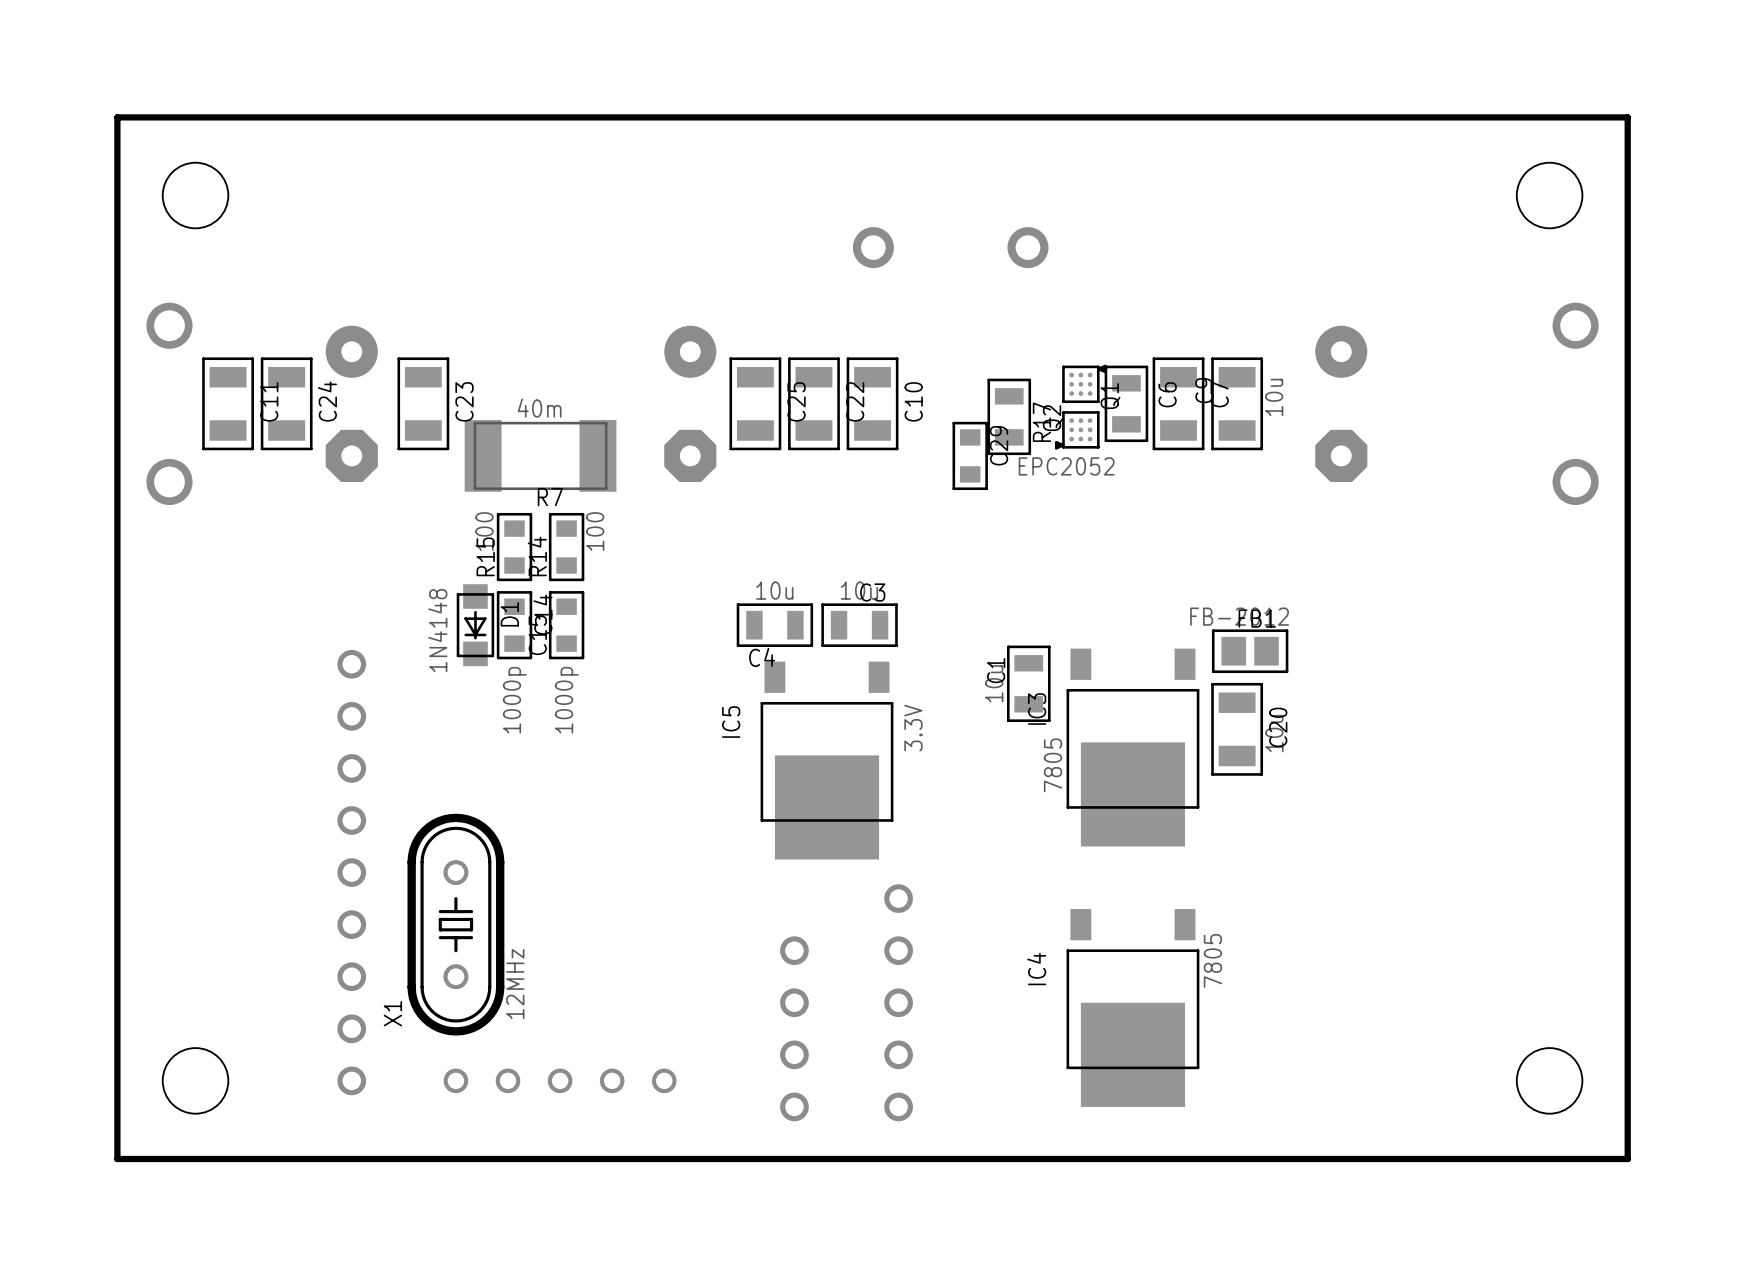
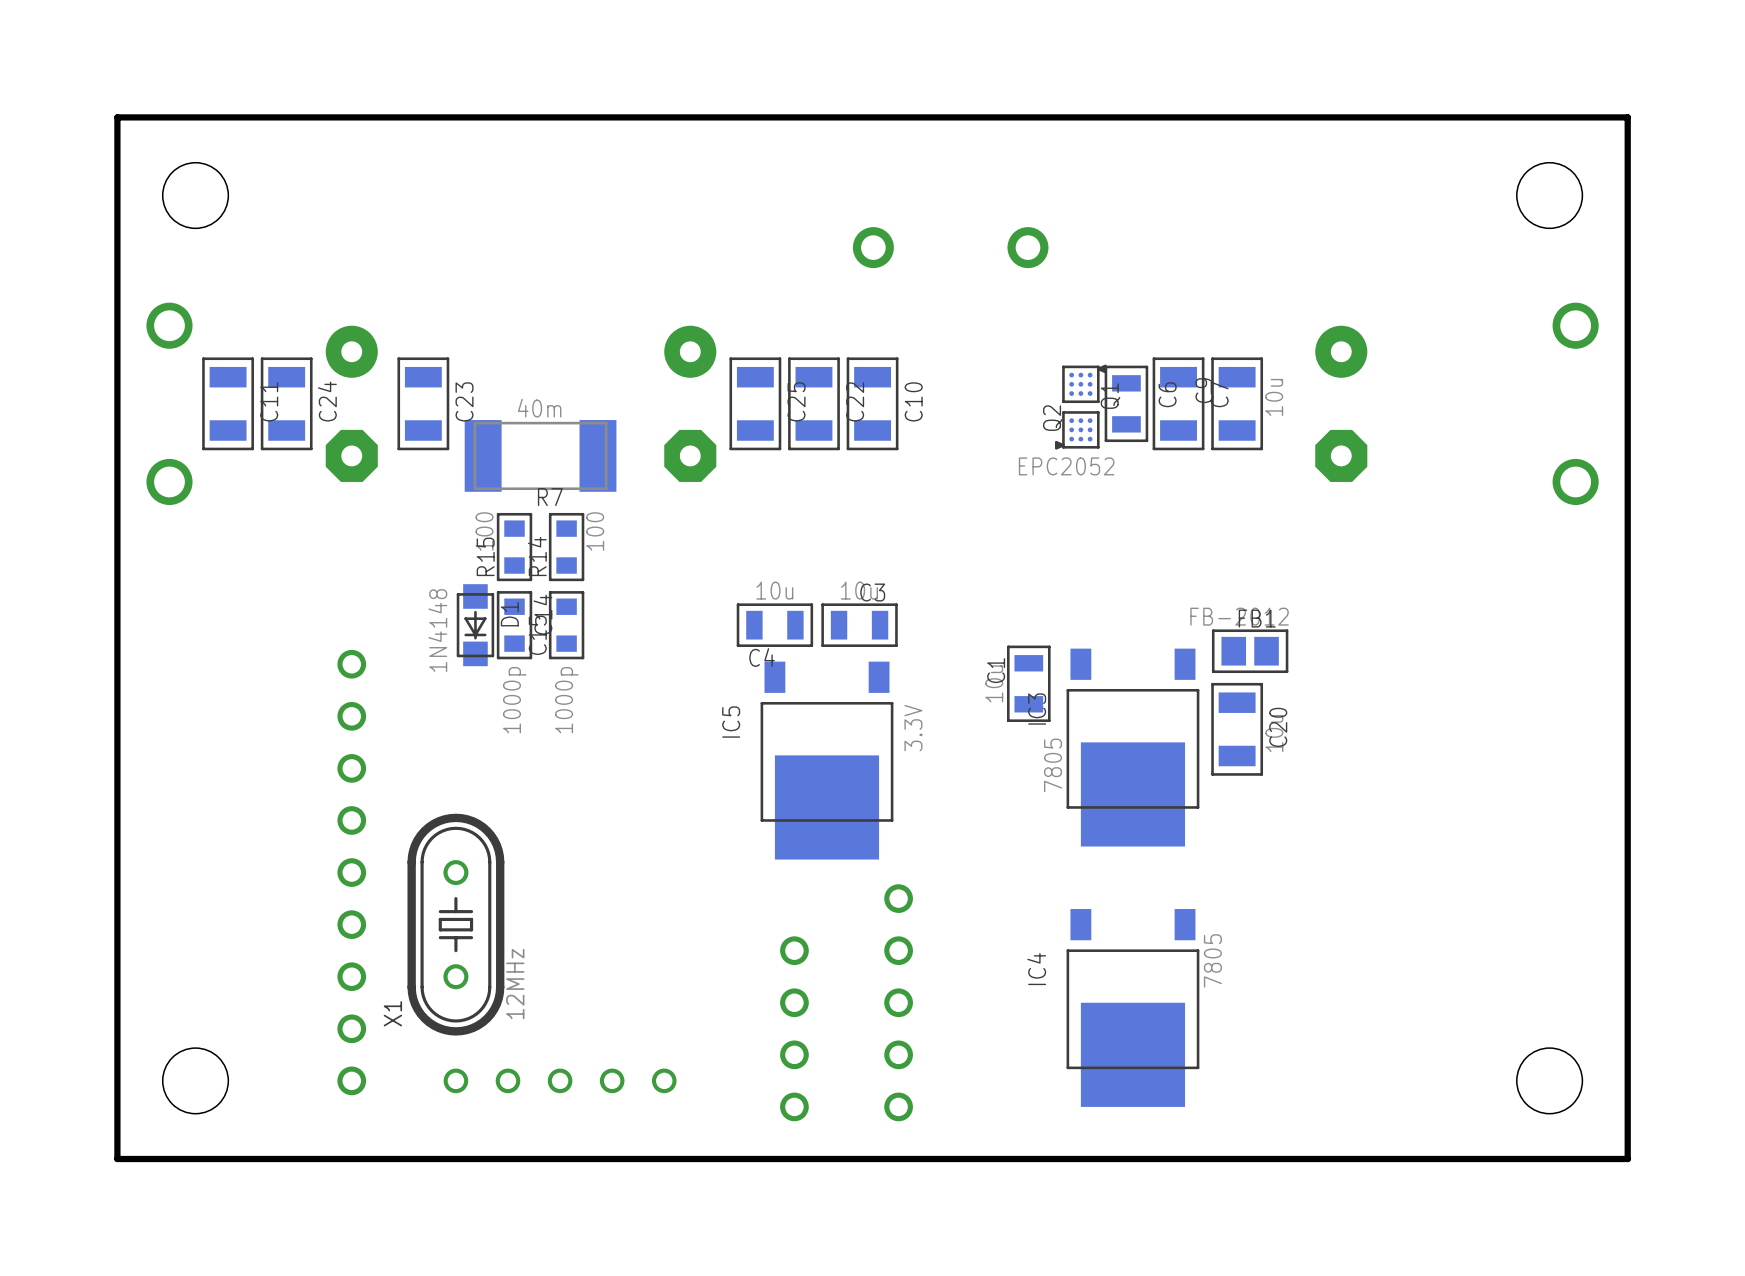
R17: (1009, 416) -> none
C29: (970, 455) -> none

